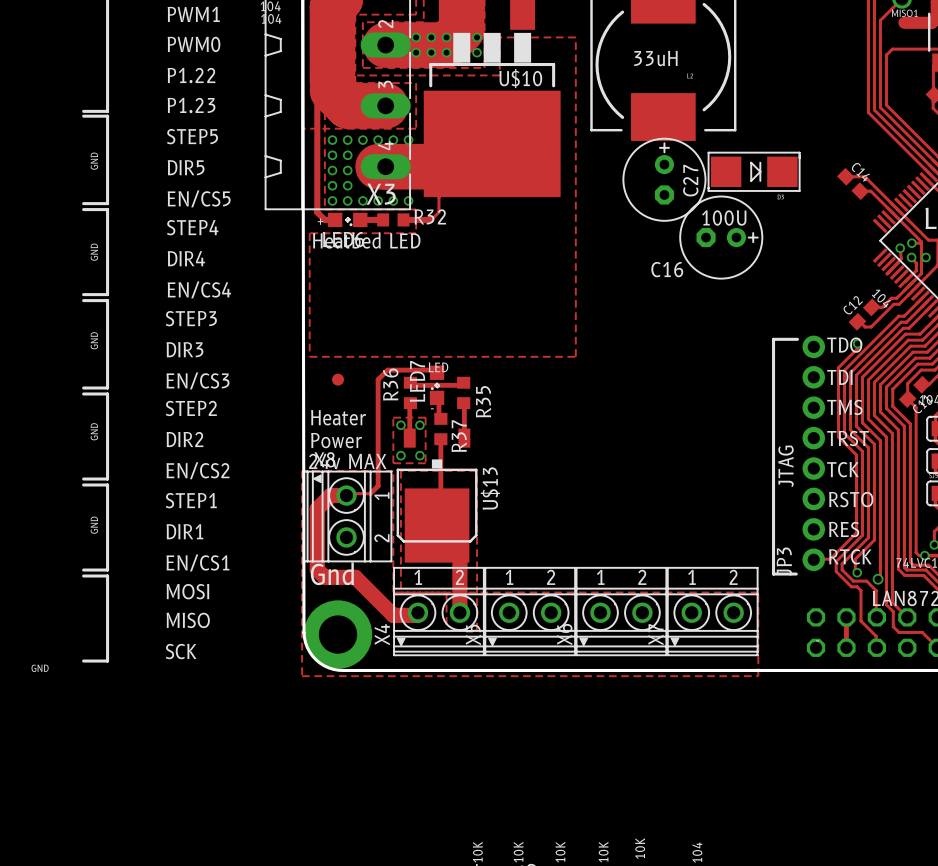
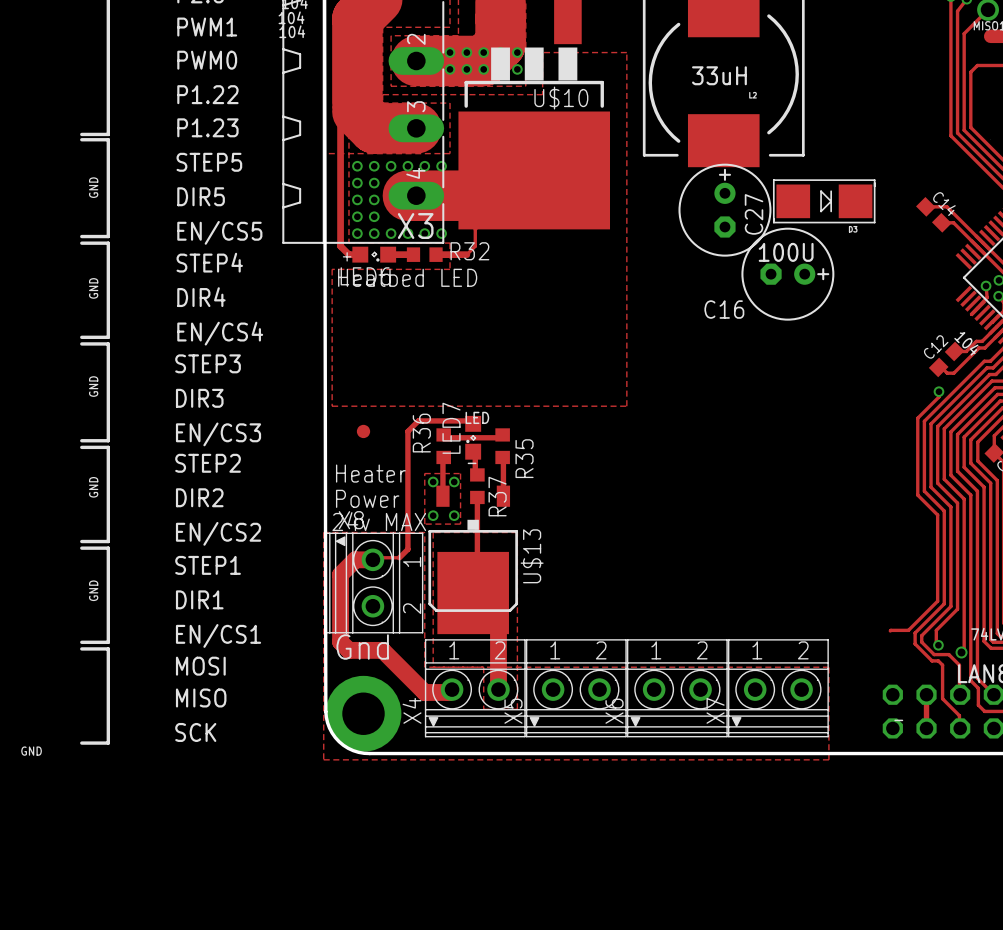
line: (797, 339) (773, 339) (773, 574) (796, 574) -> none
text: TDO (844, 345) -> none
text: TDI (839, 377) -> none
text: TMS (844, 407) -> none
text: TRST (848, 438) -> none
JP3: (813, 453) -> none
text: JTAG (786, 466) -> none
text: TCK (842, 469) -> none
text: RSTO (851, 499) -> none
text: RES (844, 529) -> none
text: RTCK (850, 556) -> none

